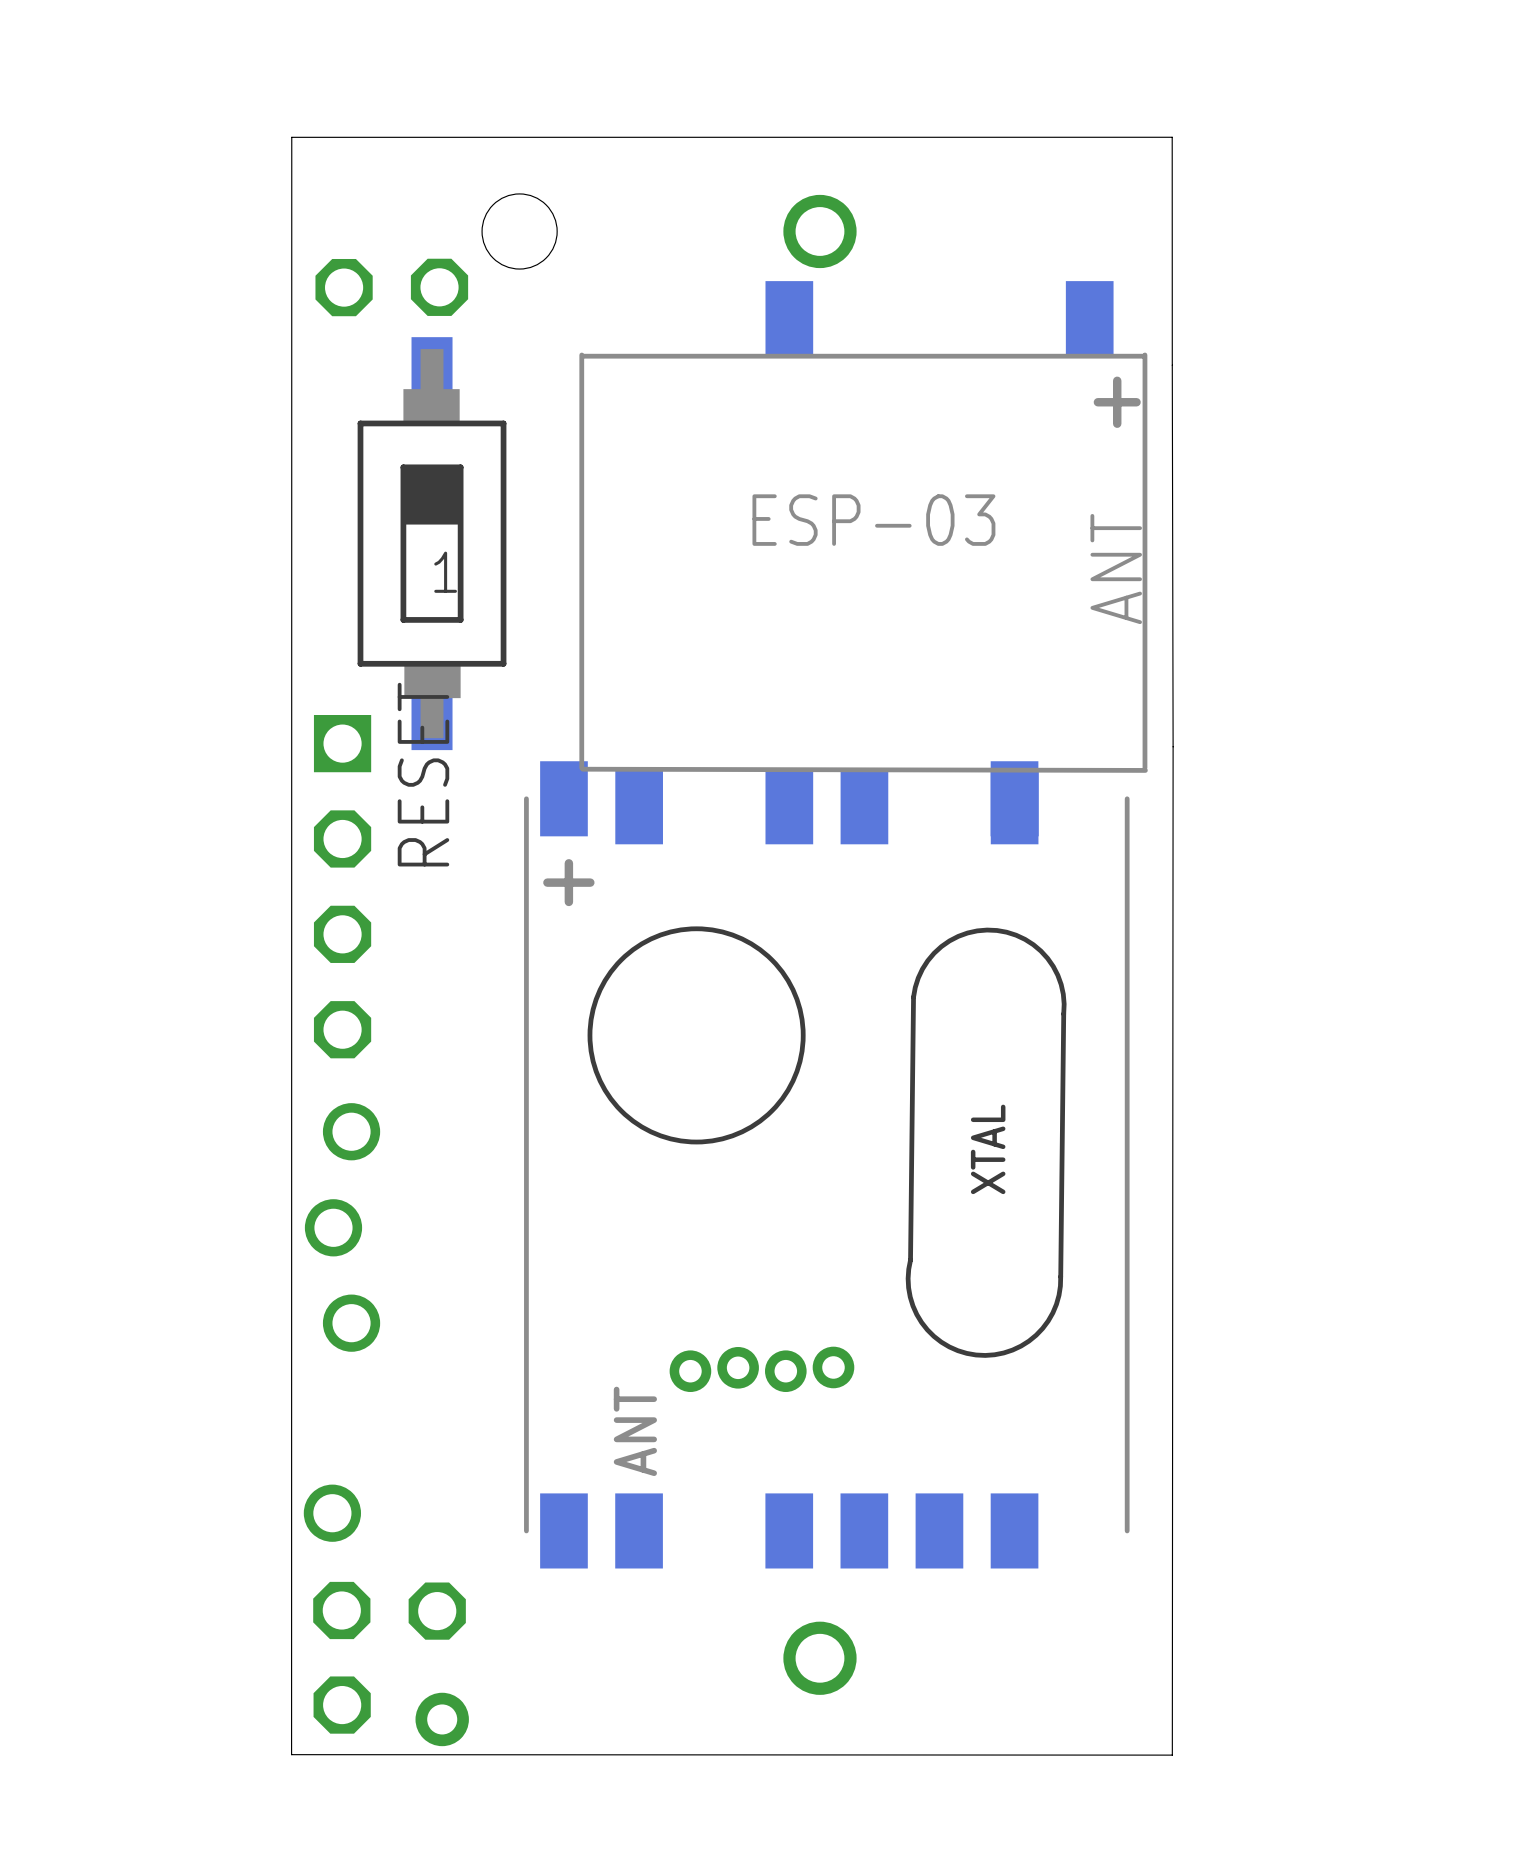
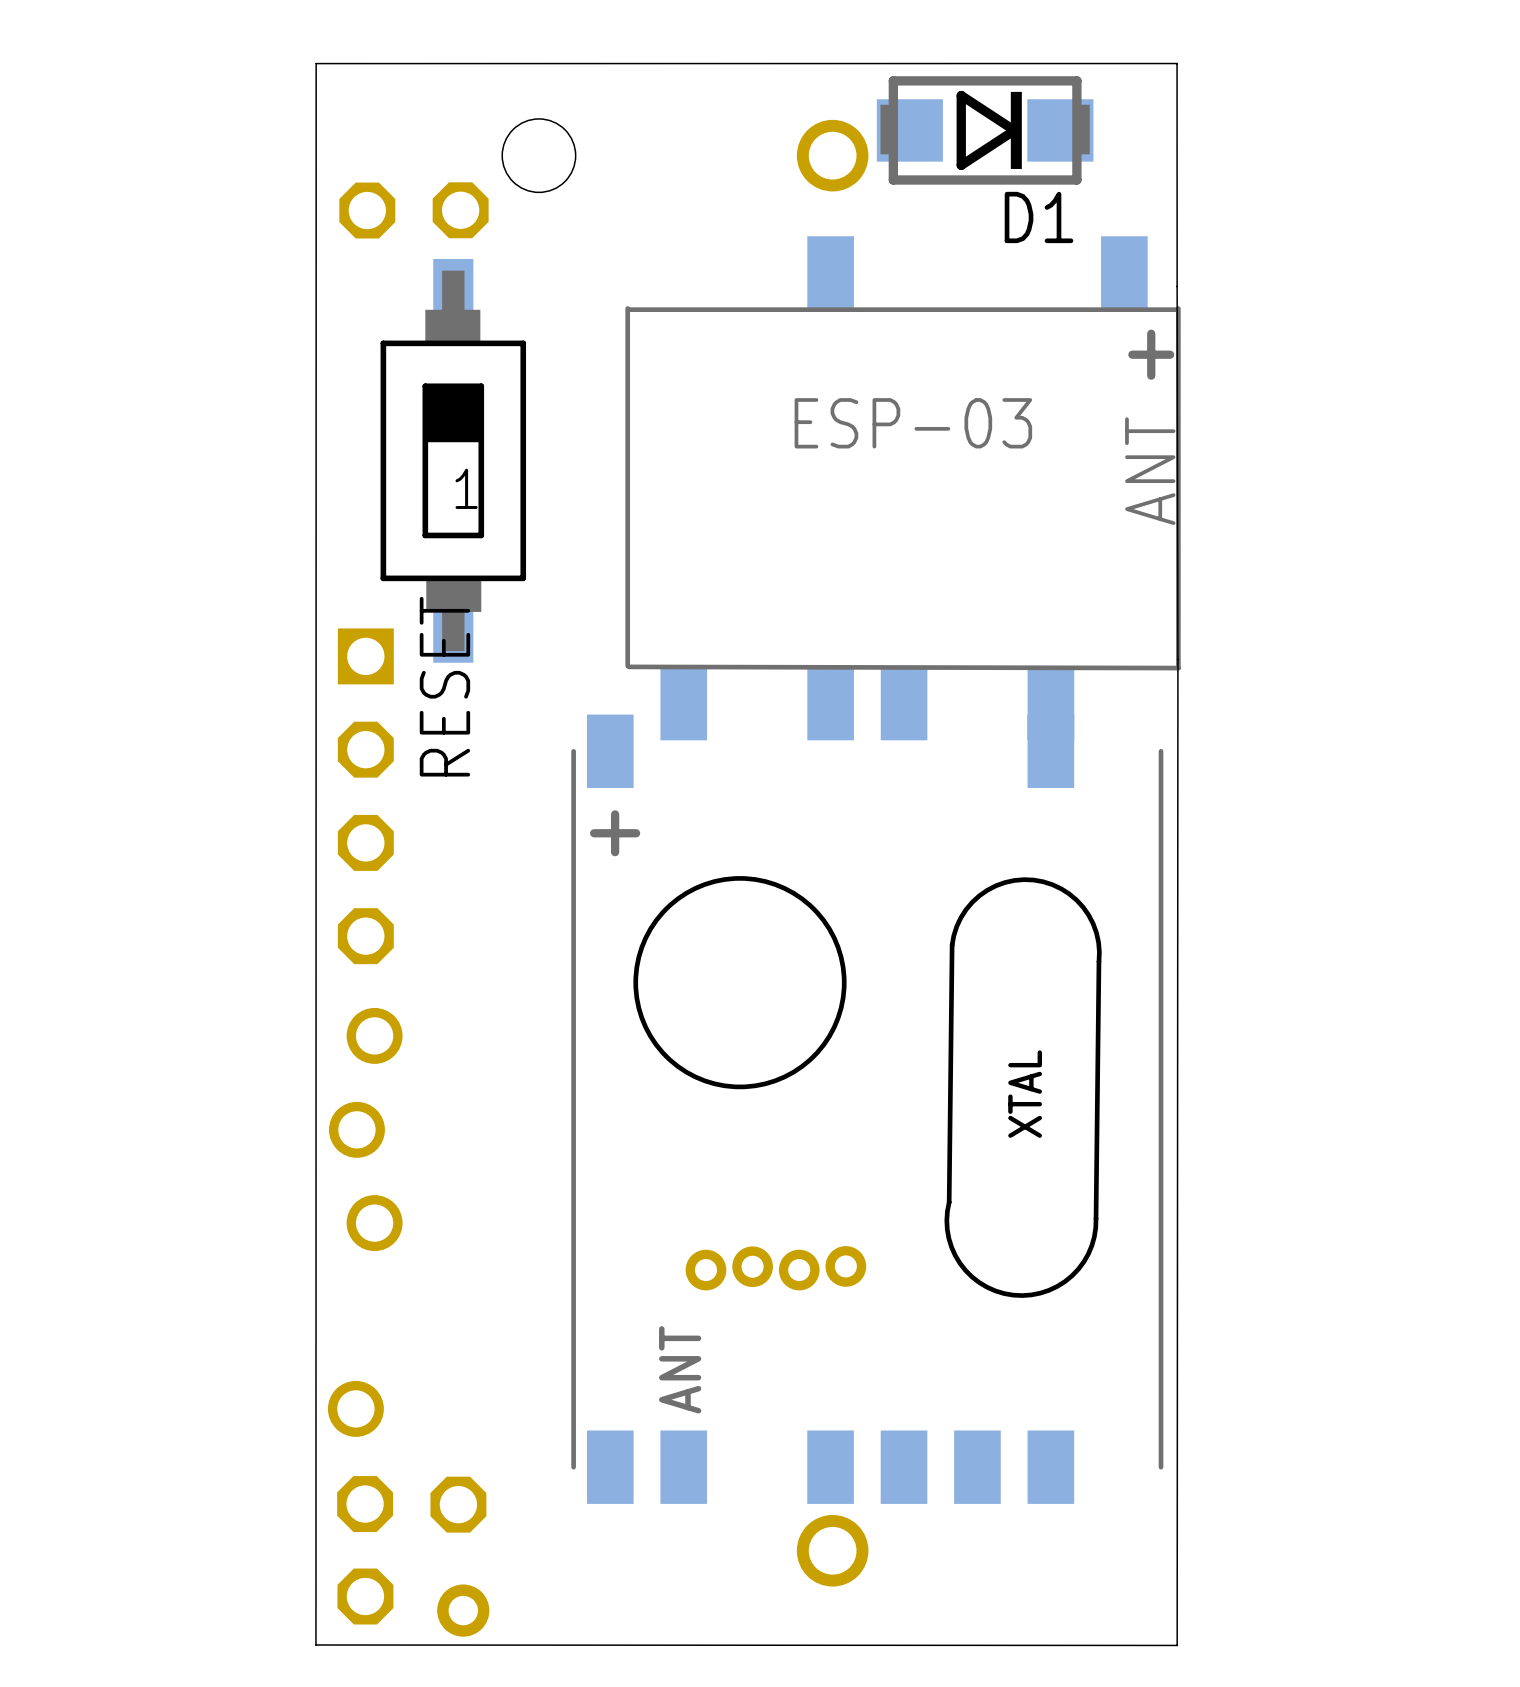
D1: none -> (985, 130)
part footprint: [579, 281, 1148, 845] -> [625, 236, 1182, 741]
part position: (826, 1164) -> (867, 1109)

